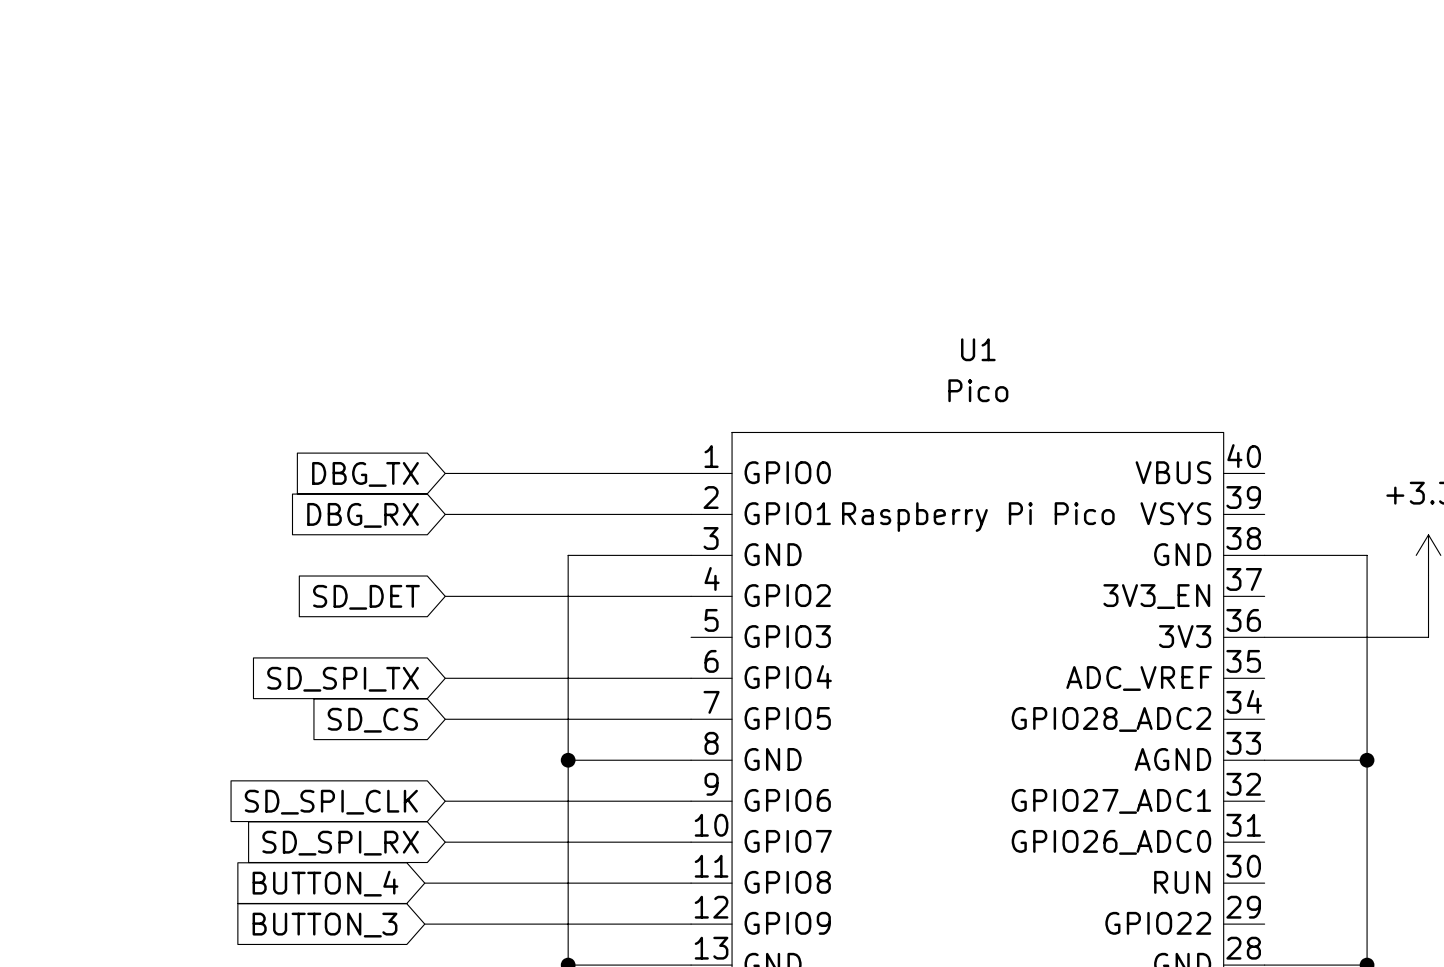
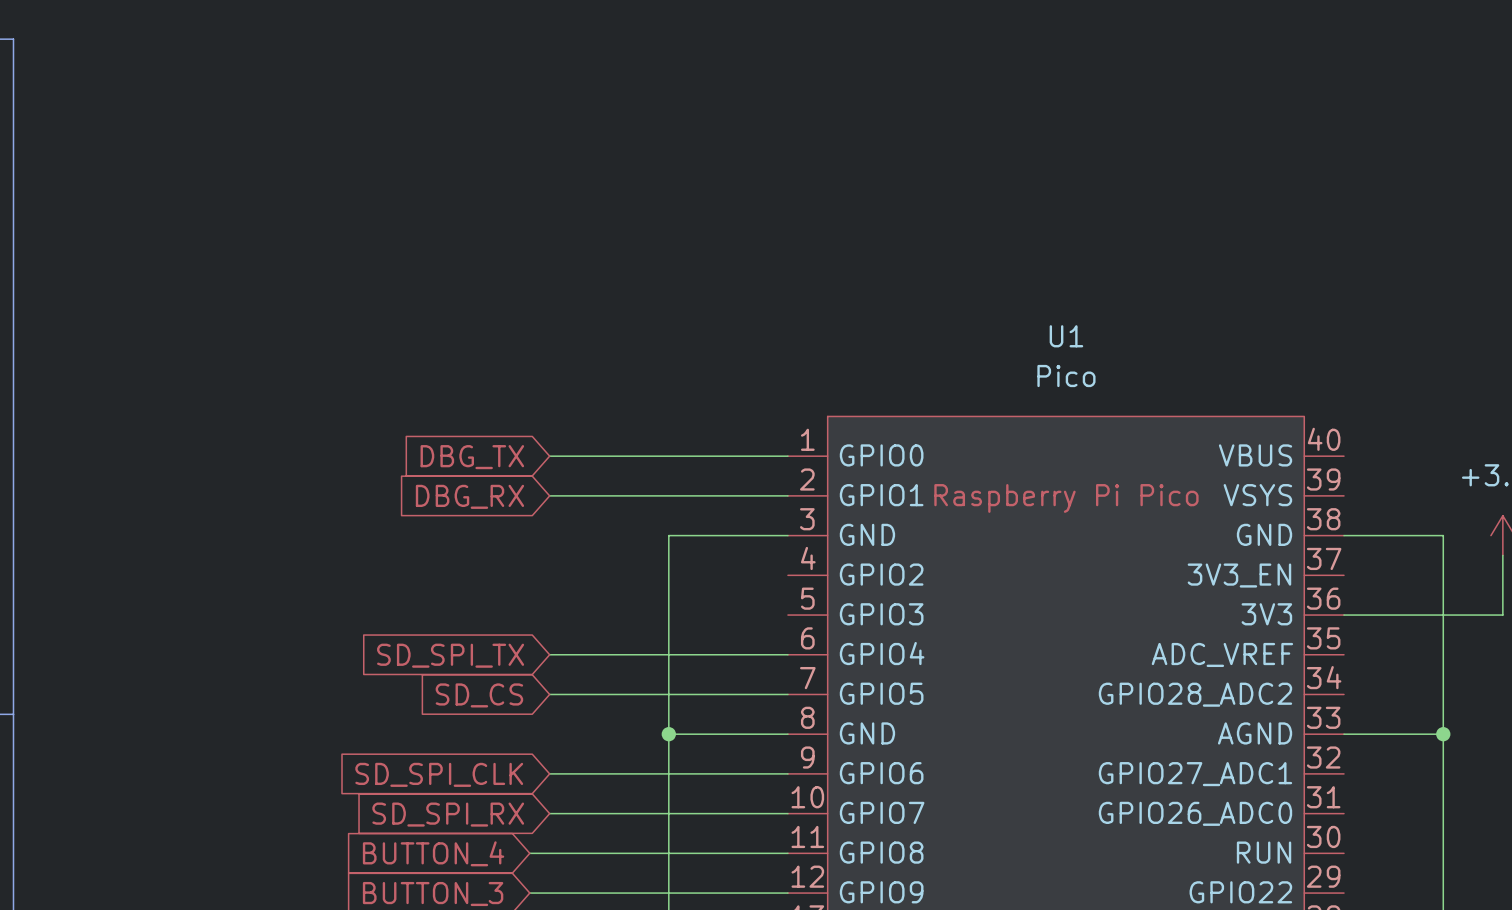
wire: (445, 596) (691, 596) -> none
global label: SD_DET (366, 597) -> none

